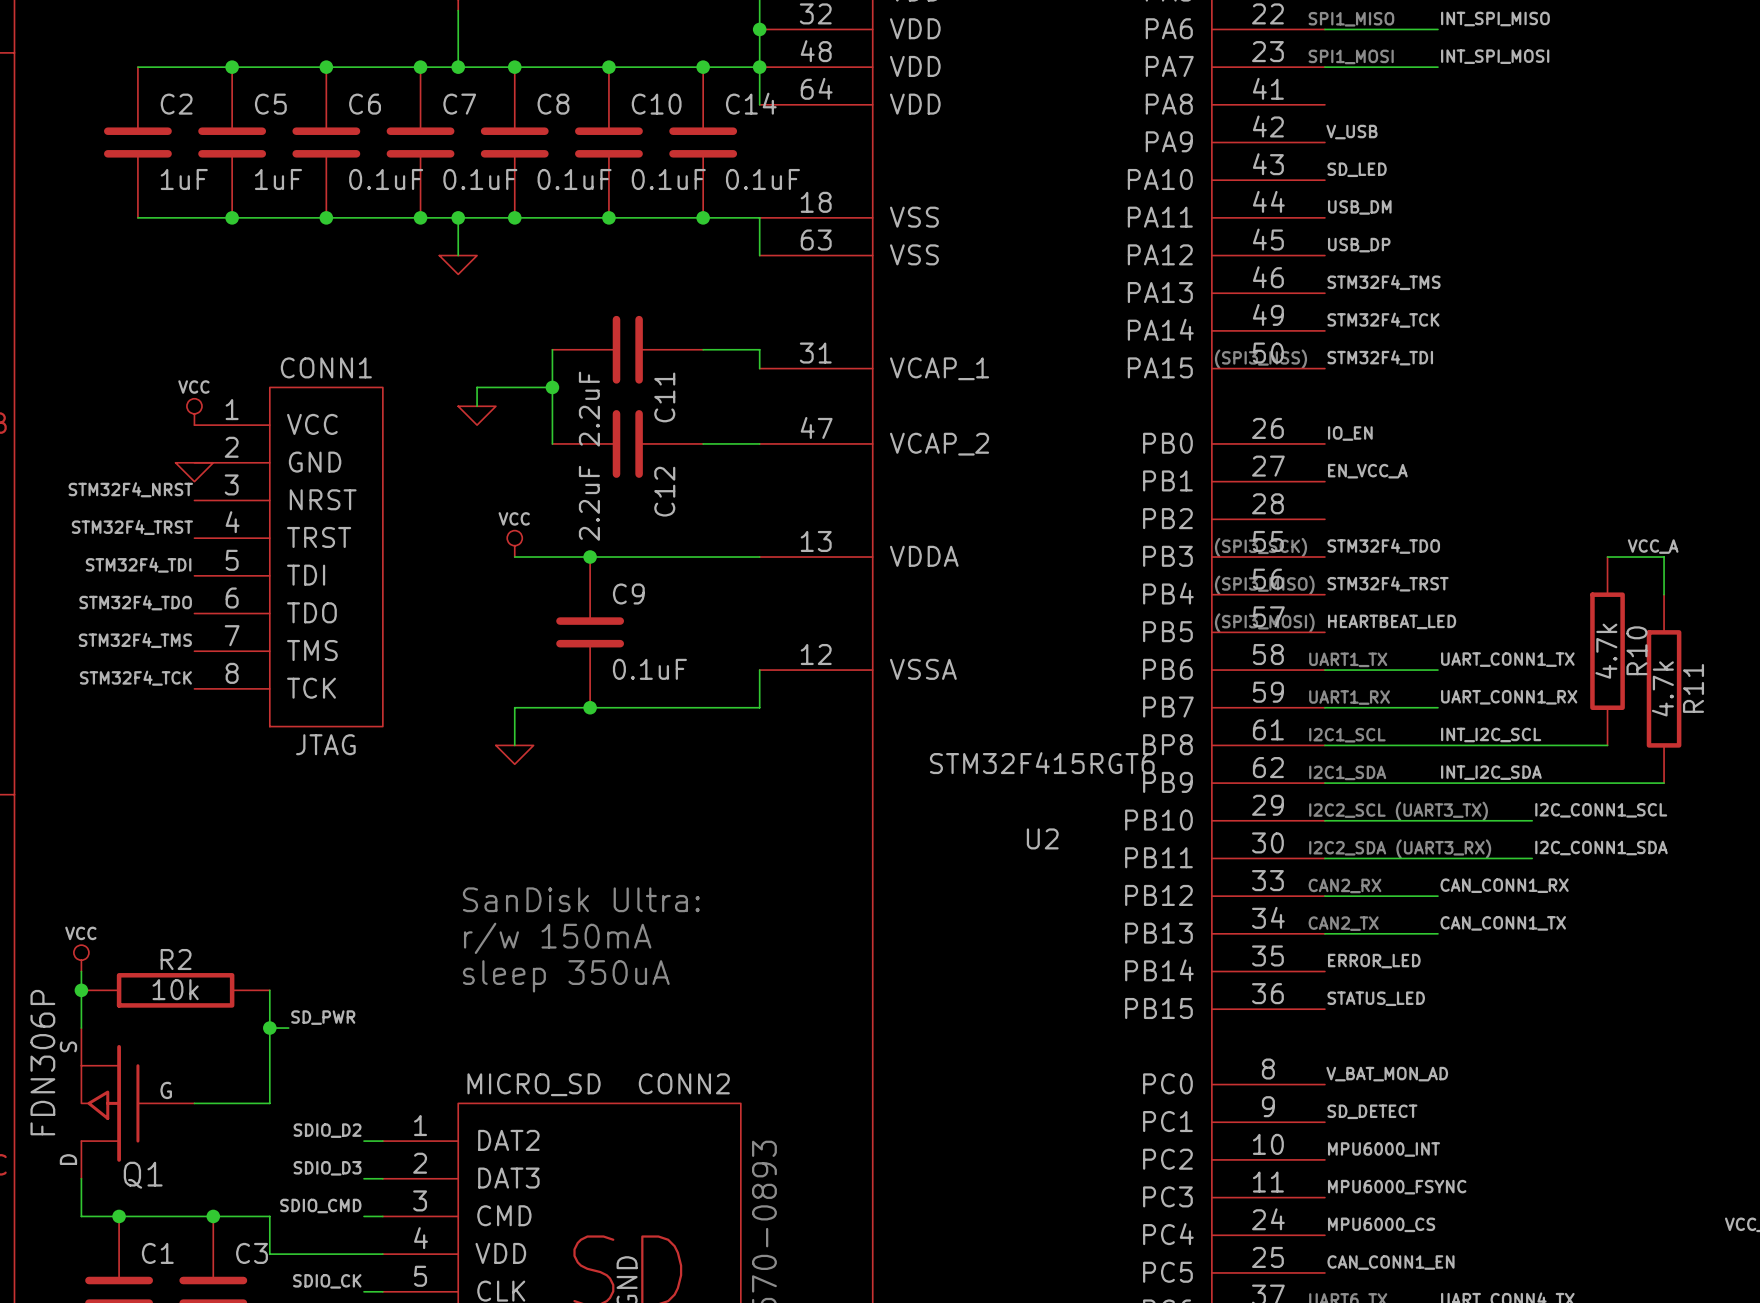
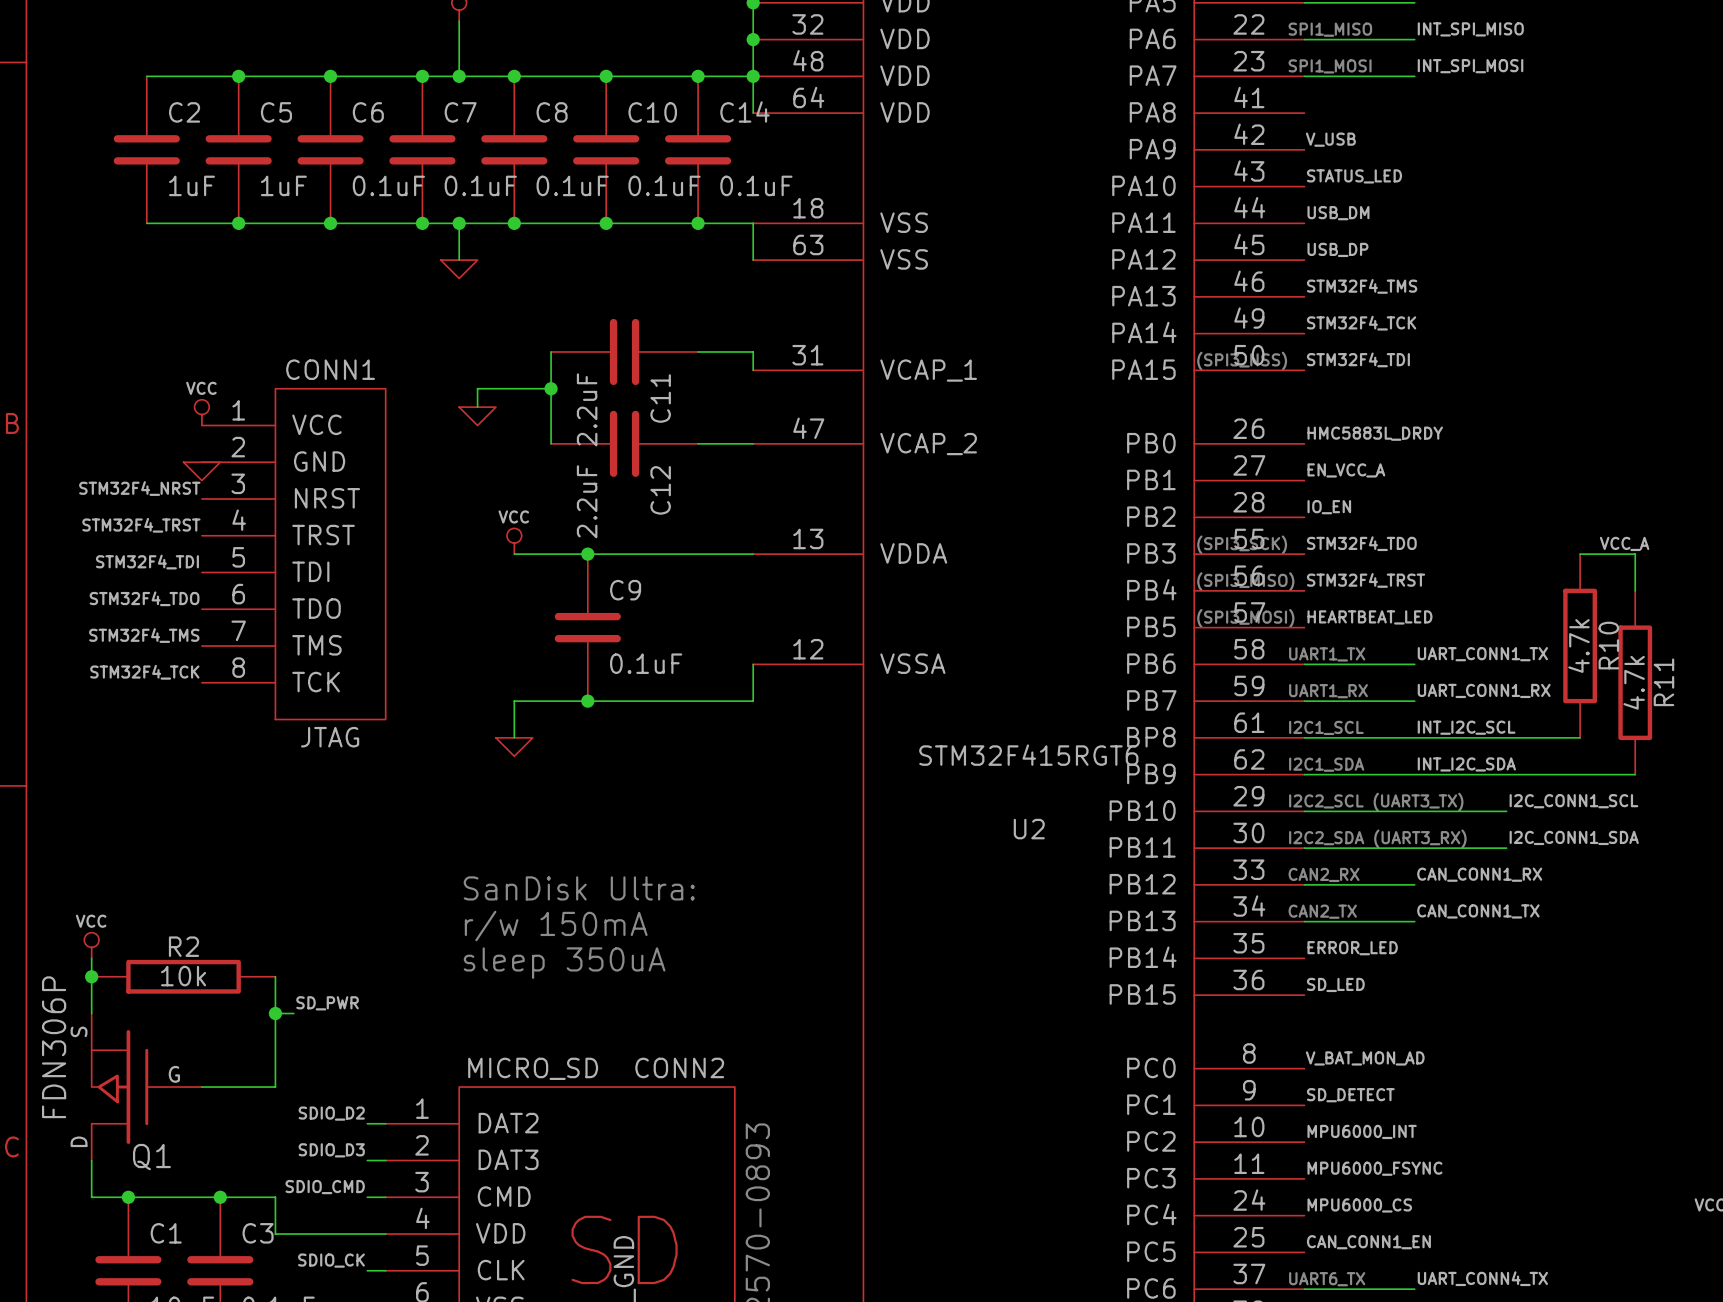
label: SD_LED (1357, 169) -> STATUS_LED (1354, 176)
label: IO_EN (1350, 433) -> HMC5883L_DRDY (1375, 433)
label: none -> IO_EN (1329, 507)
label: STATUS_LED (1376, 998) -> SD_LED (1335, 984)

